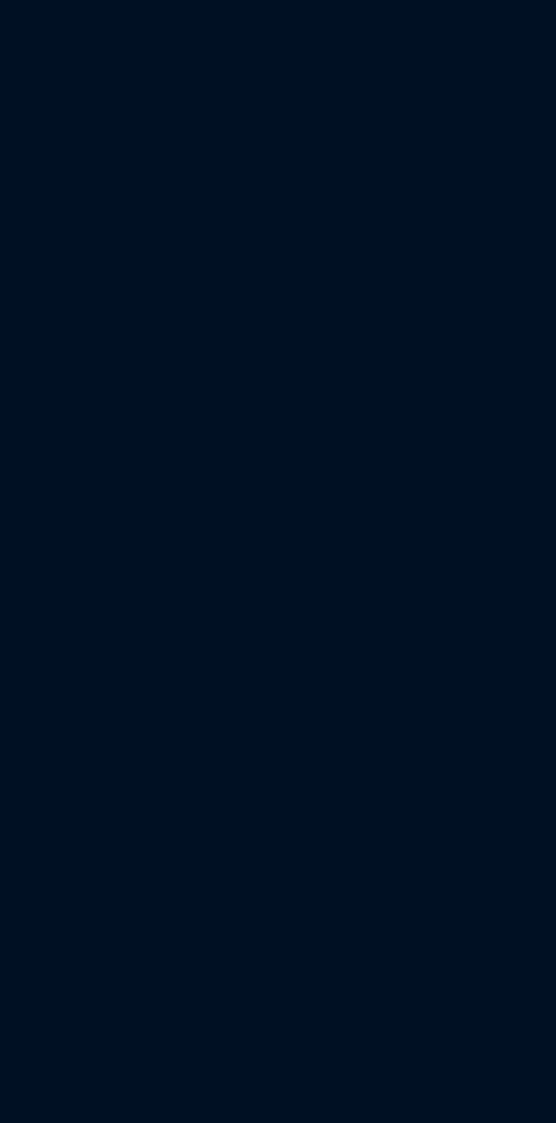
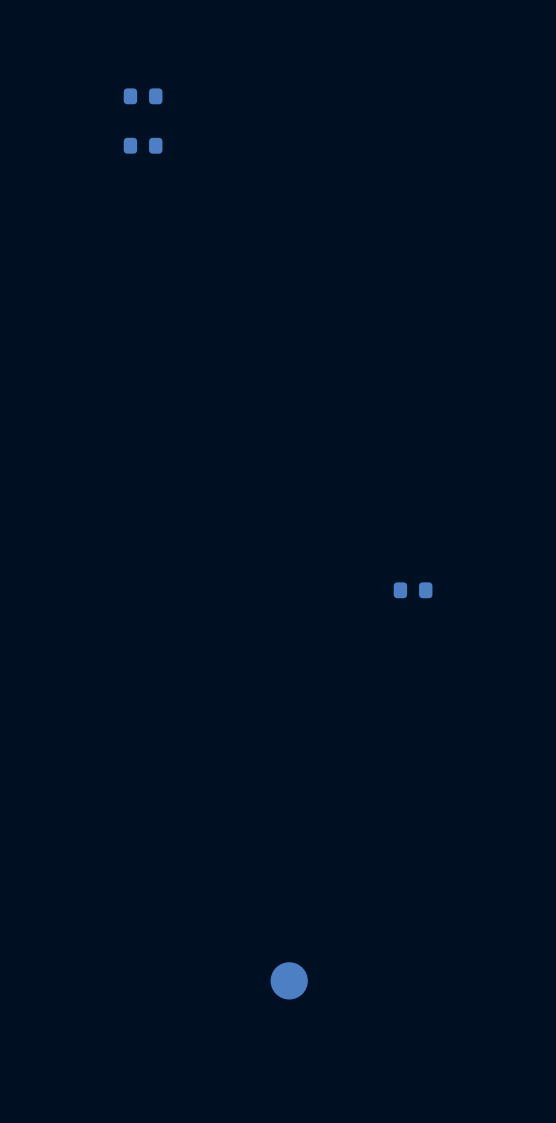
part: none -> (143, 96)
part: none -> (143, 145)
part: none -> (413, 590)
part: none -> (289, 980)

